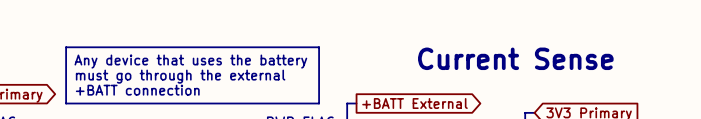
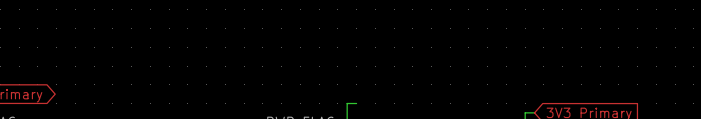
line: (66, 47) (319, 47) (319, 103) (66, 103) (66, 47) -> none
text: Current Sense (515, 58) -> none
text: Any device that uses the battery (190, 61) -> none
text: must go through the external (180, 76) -> none
text: +BATT connection (137, 90) -> none
global label: +BATT External (415, 103) -> none

